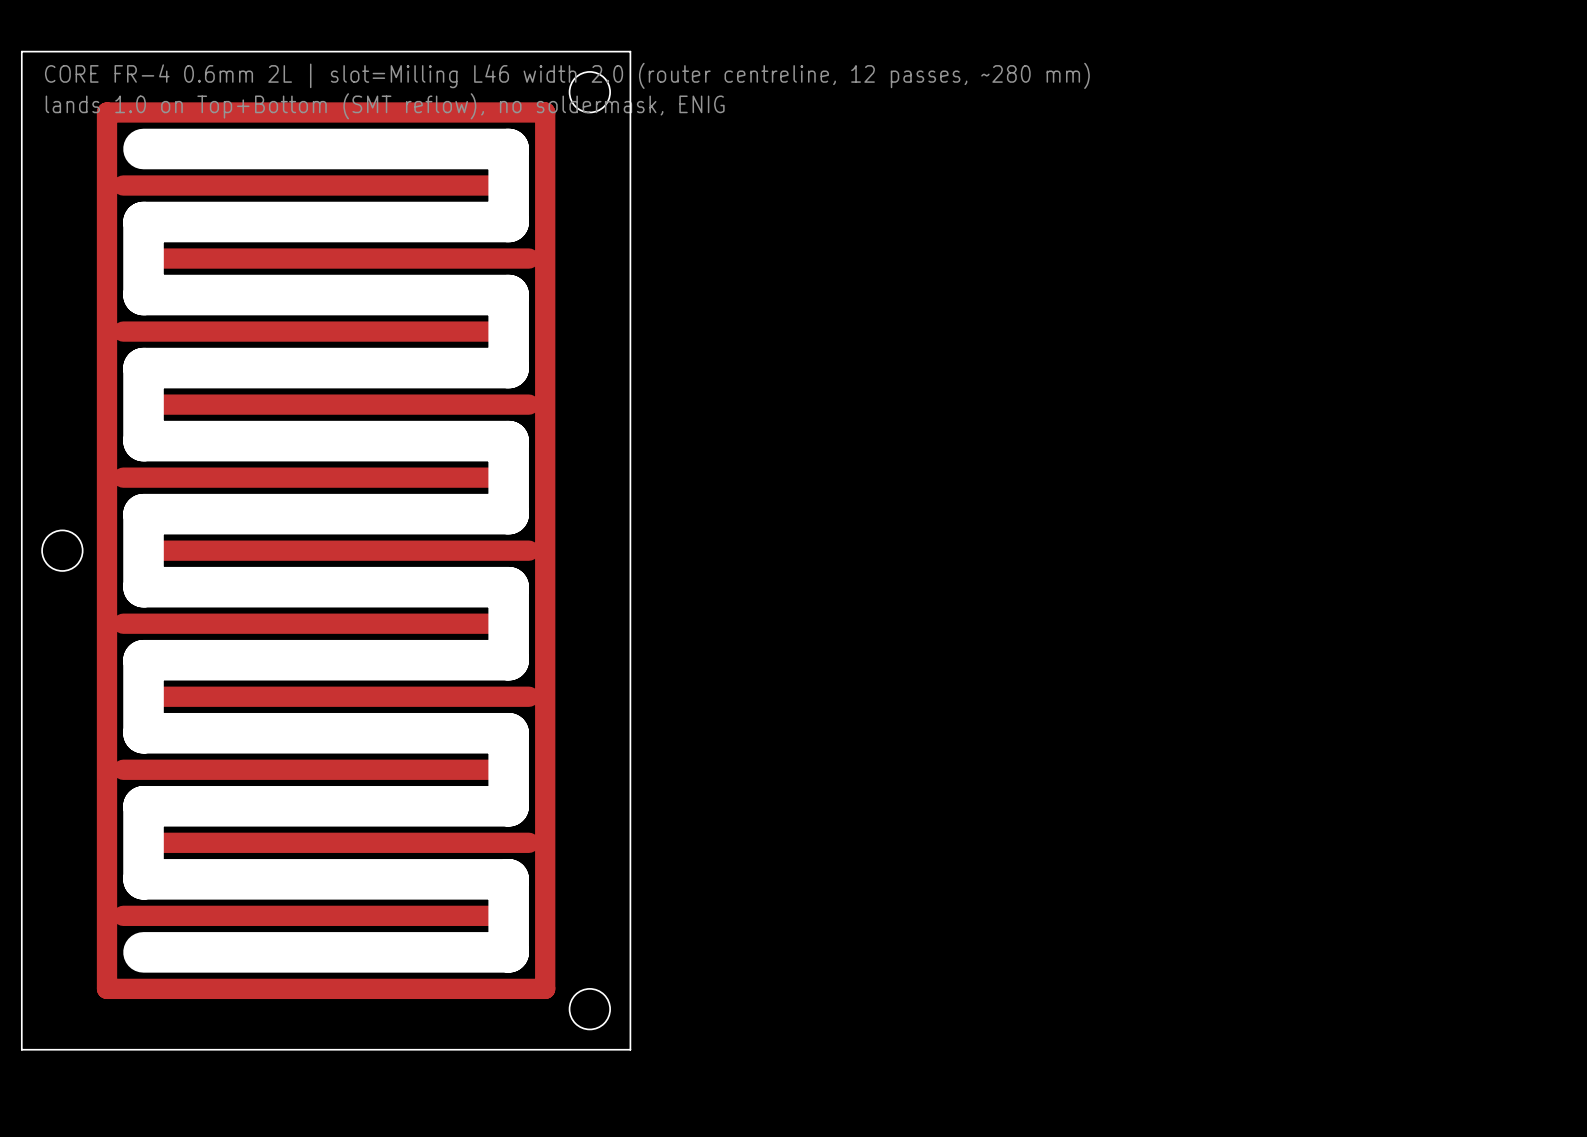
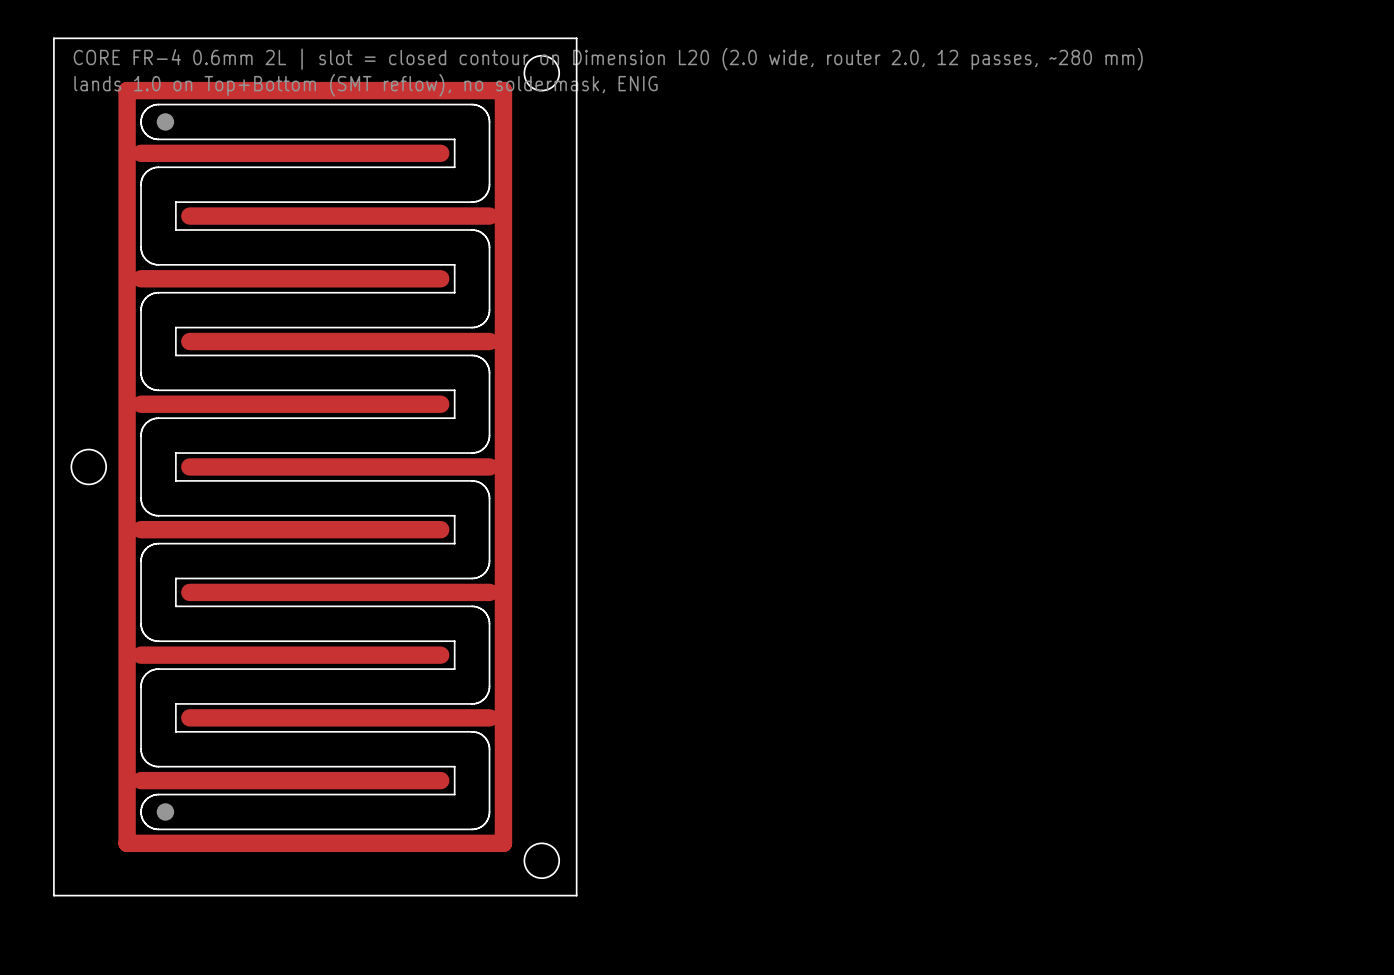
text: CORE FR-4 0.6mm 2L | slot=Milling L46 width 2.0 (router centreline, 12 passes, ~280 mm) (567, 75) -> CORE FR-4 0.6mm 2L | slot = closed contour on Dimension L20 (2.0 wide, router 2.0, 12 passes, ~280 mm) (608, 59)
board edge: none -> (158, 104) (147, 108) (141, 119) (144, 132) (153, 138) (454, 139) (454, 167) (153, 167) (144, 174) (141, 184) (141, 249) (144, 258) (149, 262) (158, 264) (454, 264) (454, 292) (153, 293) (144, 299) (141, 307) (141, 372) (146, 385) (158, 390) (454, 390) (454, 418) (153, 418) (144, 424) (141, 433) (141, 498) (144, 508) (151, 514) (158, 515) (454, 515) (454, 543) (153, 544) (144, 550) (141, 558) (141, 623) (143, 632) (149, 638) (158, 641) (454, 641) (454, 669) (153, 669) (144, 675) (141, 684) (142, 755) (147, 763) (158, 766) (454, 766) (454, 794) (156, 794) (147, 798) (143, 803) (141, 811) (142, 818) (147, 825) (158, 829) (478, 828) (485, 822) (489, 811) (489, 746) (485, 738) (478, 733) (175, 731) (175, 703) (476, 703) (485, 697) (489, 686) (489, 621) (482, 609) (472, 606) (175, 606) (175, 578) (476, 577) (485, 571) (489, 563) (489, 498) (485, 487) (478, 482) (472, 480) (175, 480) (175, 453) (476, 452) (485, 446) (489, 437) (489, 372) (487, 364) (480, 357) (472, 355) (175, 355) (175, 327) (476, 326) (485, 320) (489, 312) (488, 240) (482, 233) (472, 229) (175, 229) (175, 202) (476, 201) (485, 195) (489, 186) (488, 115) (482, 108) (472, 104) (158, 104)
board edge: (143, 149) (508, 149) (508, 222) (143, 222) (143, 295) (508, 295) (508, 368) (143, 368) (143, 441) (508, 441) (508, 514) (143, 514) (143, 587) (508, 587) (508, 660) (143, 660) (143, 733) (508, 733) (508, 806) (143, 806) (143, 879) (508, 879) (508, 952) (143, 952) -> none
track: (472, 185) (488, 185) -> none
track: (163, 258) (180, 258) -> none
track: (472, 331) (488, 331) -> none
track: (163, 404) (180, 404) -> none
track: (472, 477) (488, 477) -> none
track: (163, 550) (180, 550) -> none
track: (472, 623) (488, 623) -> none
track: (163, 696) (180, 696) -> none
track: (472, 769) (488, 769) -> none
track: (163, 842) (180, 842) -> none
track: (472, 915) (488, 915) -> none

